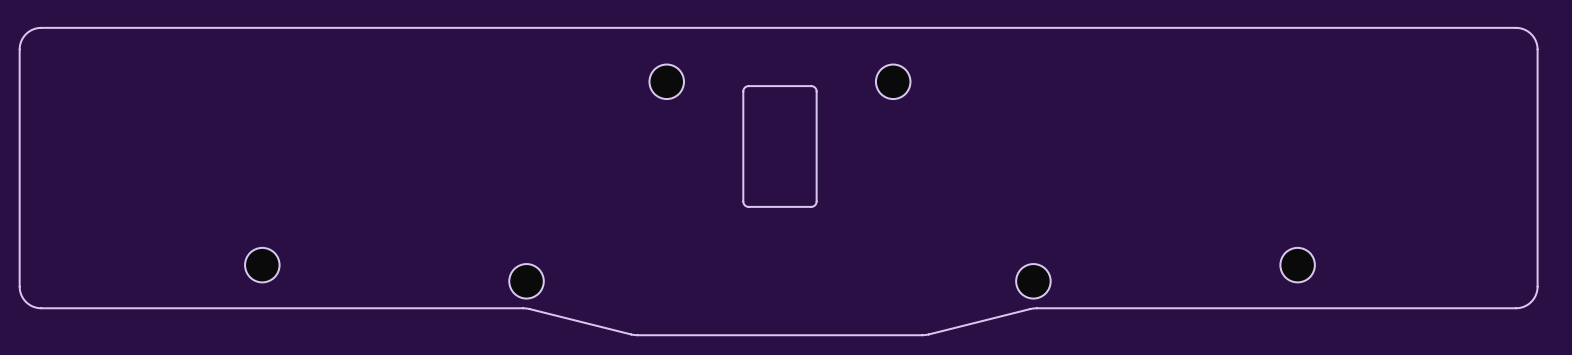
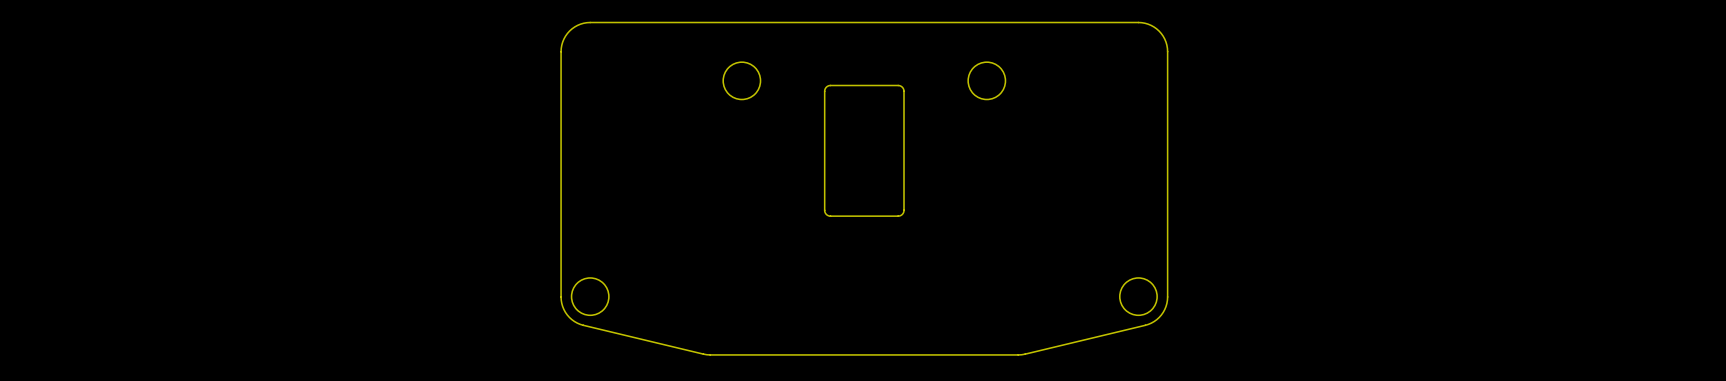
board edge: (526, 27) (41, 27) (31, 30) (22, 37) (19, 49) (20, 293) (29, 304) (41, 308) (526, 308) (631, 334) -> (590, 22) (580, 24) (572, 28) (565, 36) (561, 48) (561, 296) (562, 306) (569, 317) (580, 324) (703, 354)
board edge: (1033, 27) (1516, 27) (1525, 30) (1534, 37) (1537, 49) (1536, 293) (1529, 303) (1516, 308) (1033, 308) (928, 334) -> (1138, 22) (1148, 24) (1156, 28) (1164, 39) (1167, 48) (1167, 296) (1166, 306) (1159, 317) (1148, 324) (1025, 354)
part: (262, 265) -> none
part: (1297, 265) -> none

